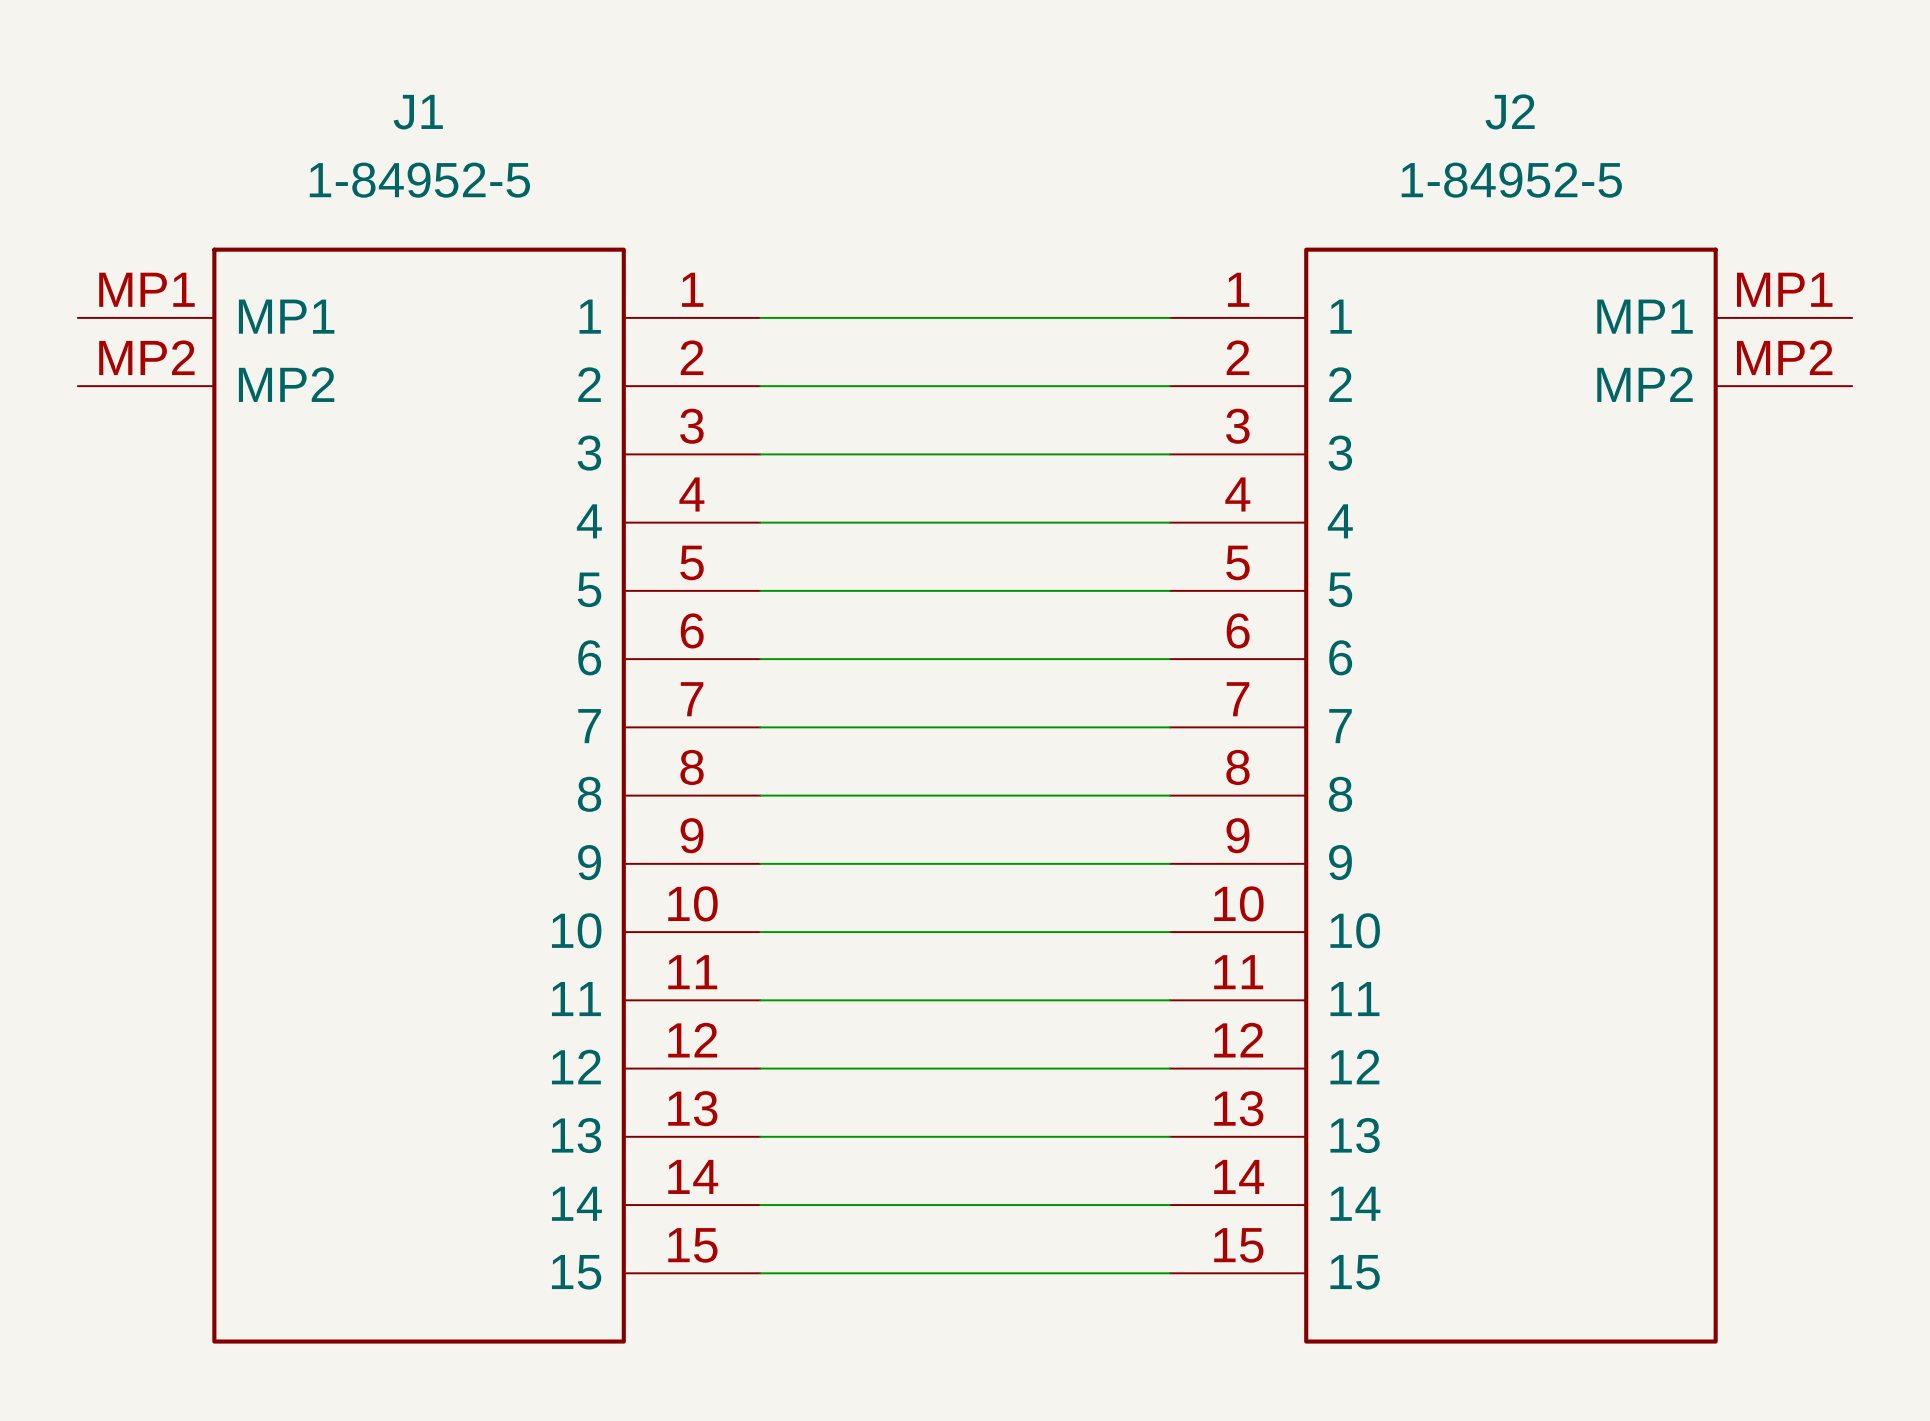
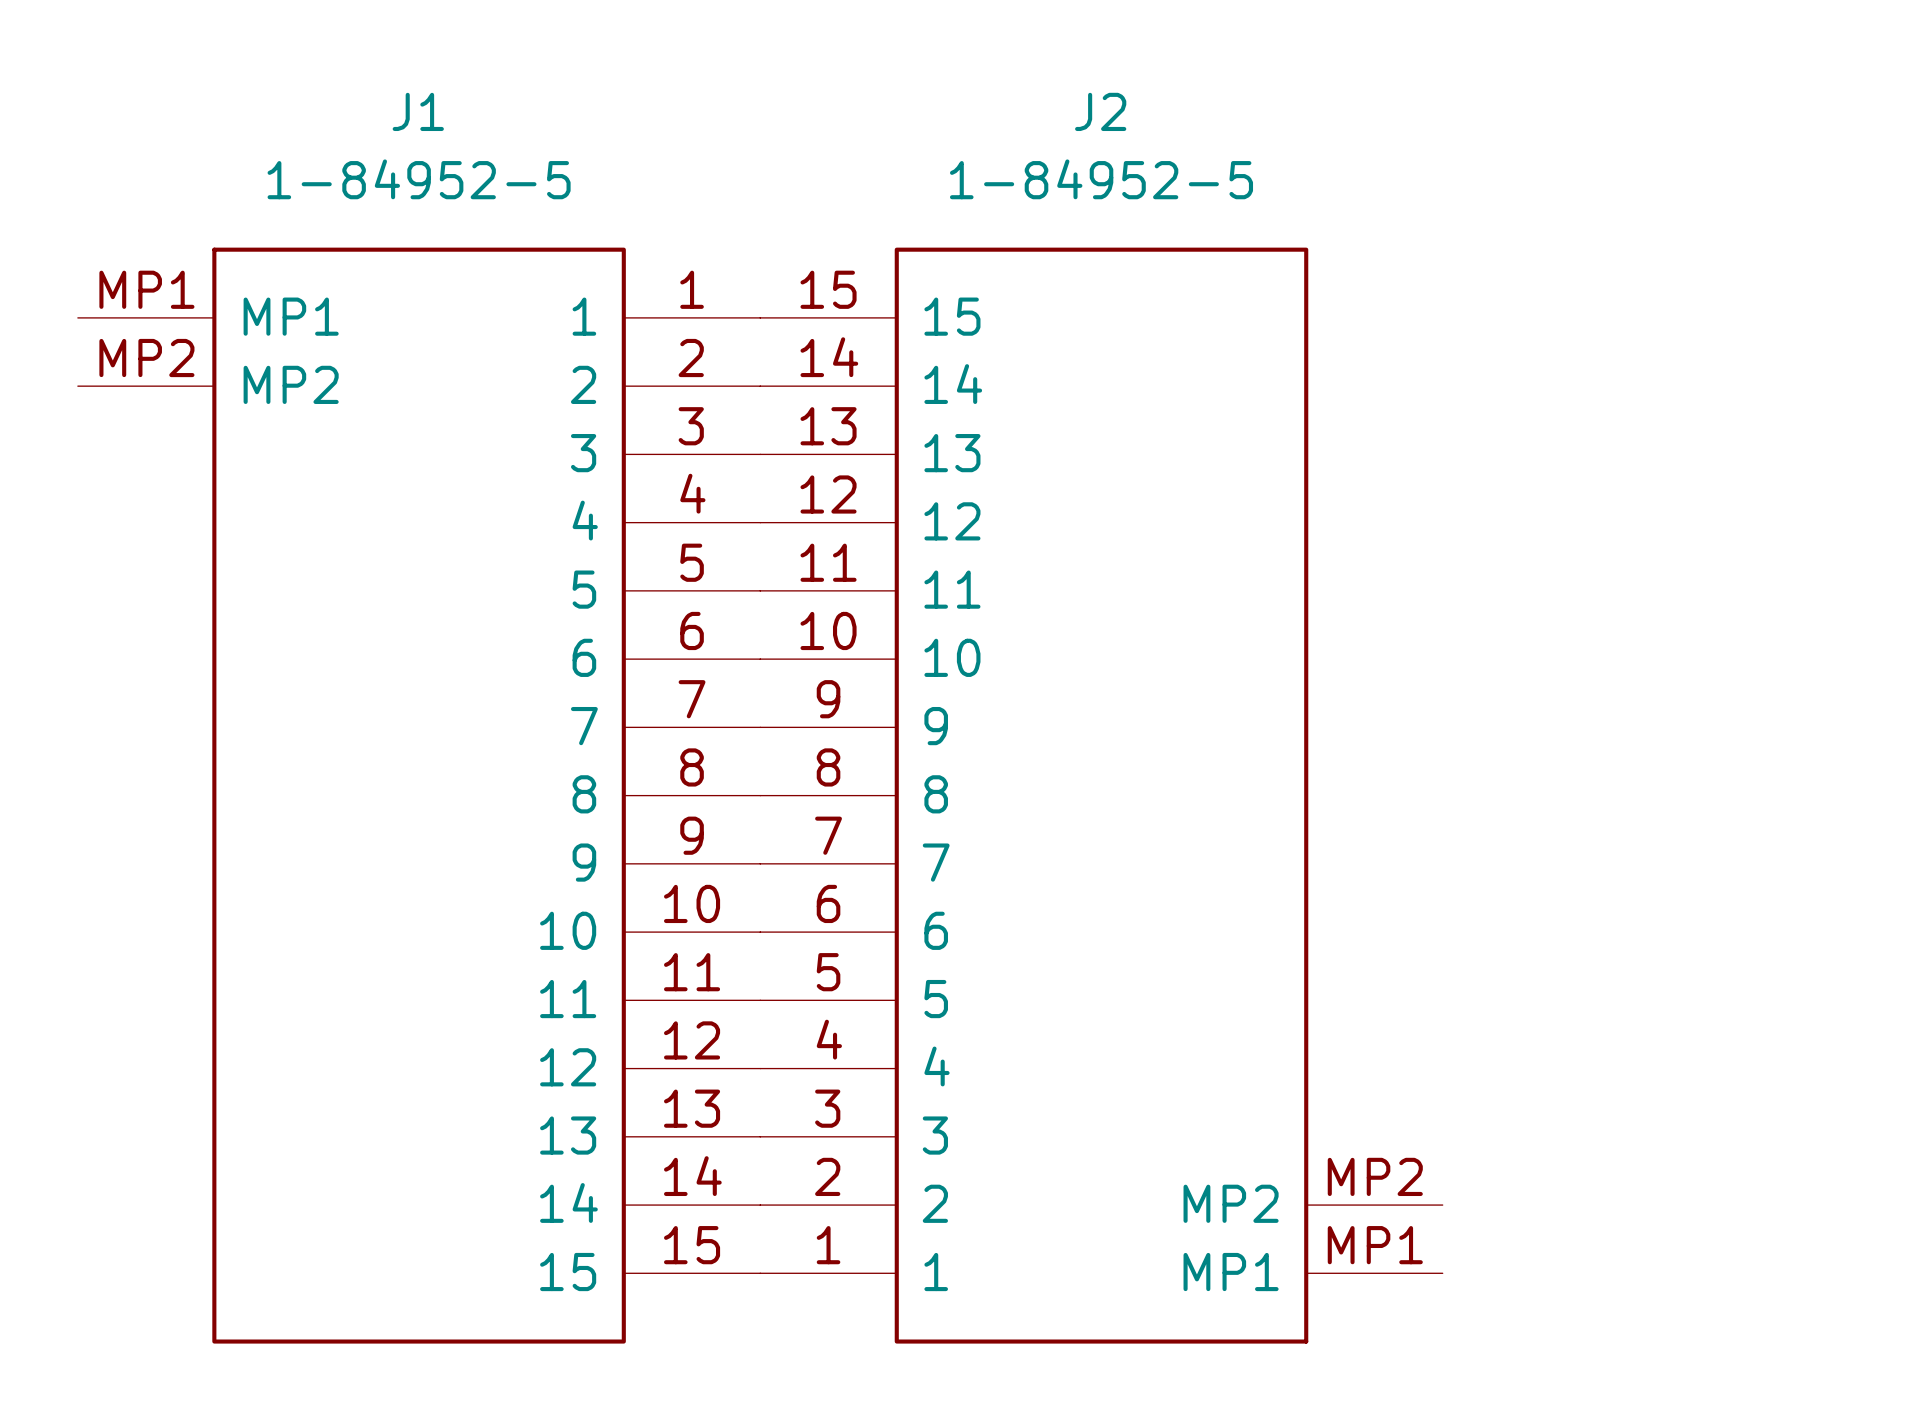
wire: (760, 317) (1169, 317) -> none
wire: (760, 386) (1169, 386) -> none
wire: (760, 454) (1169, 454) -> none
wire: (760, 522) (1169, 522) -> none
wire: (760, 590) (1169, 590) -> none
wire: (760, 659) (1169, 659) -> none
wire: (760, 727) (1169, 727) -> none
wire: (760, 795) (1169, 795) -> none
J2 flip: as is (1510, 795) -> up-down (1101, 795)
wire: (760, 863) (1169, 863) -> none
wire: (760, 932) (1169, 932) -> none
wire: (760, 1000) (1169, 1000) -> none
wire: (760, 1068) (1169, 1068) -> none
wire: (760, 1136) (1169, 1136) -> none
wire: (760, 1205) (1169, 1205) -> none
wire: (760, 1273) (1169, 1273) -> none

